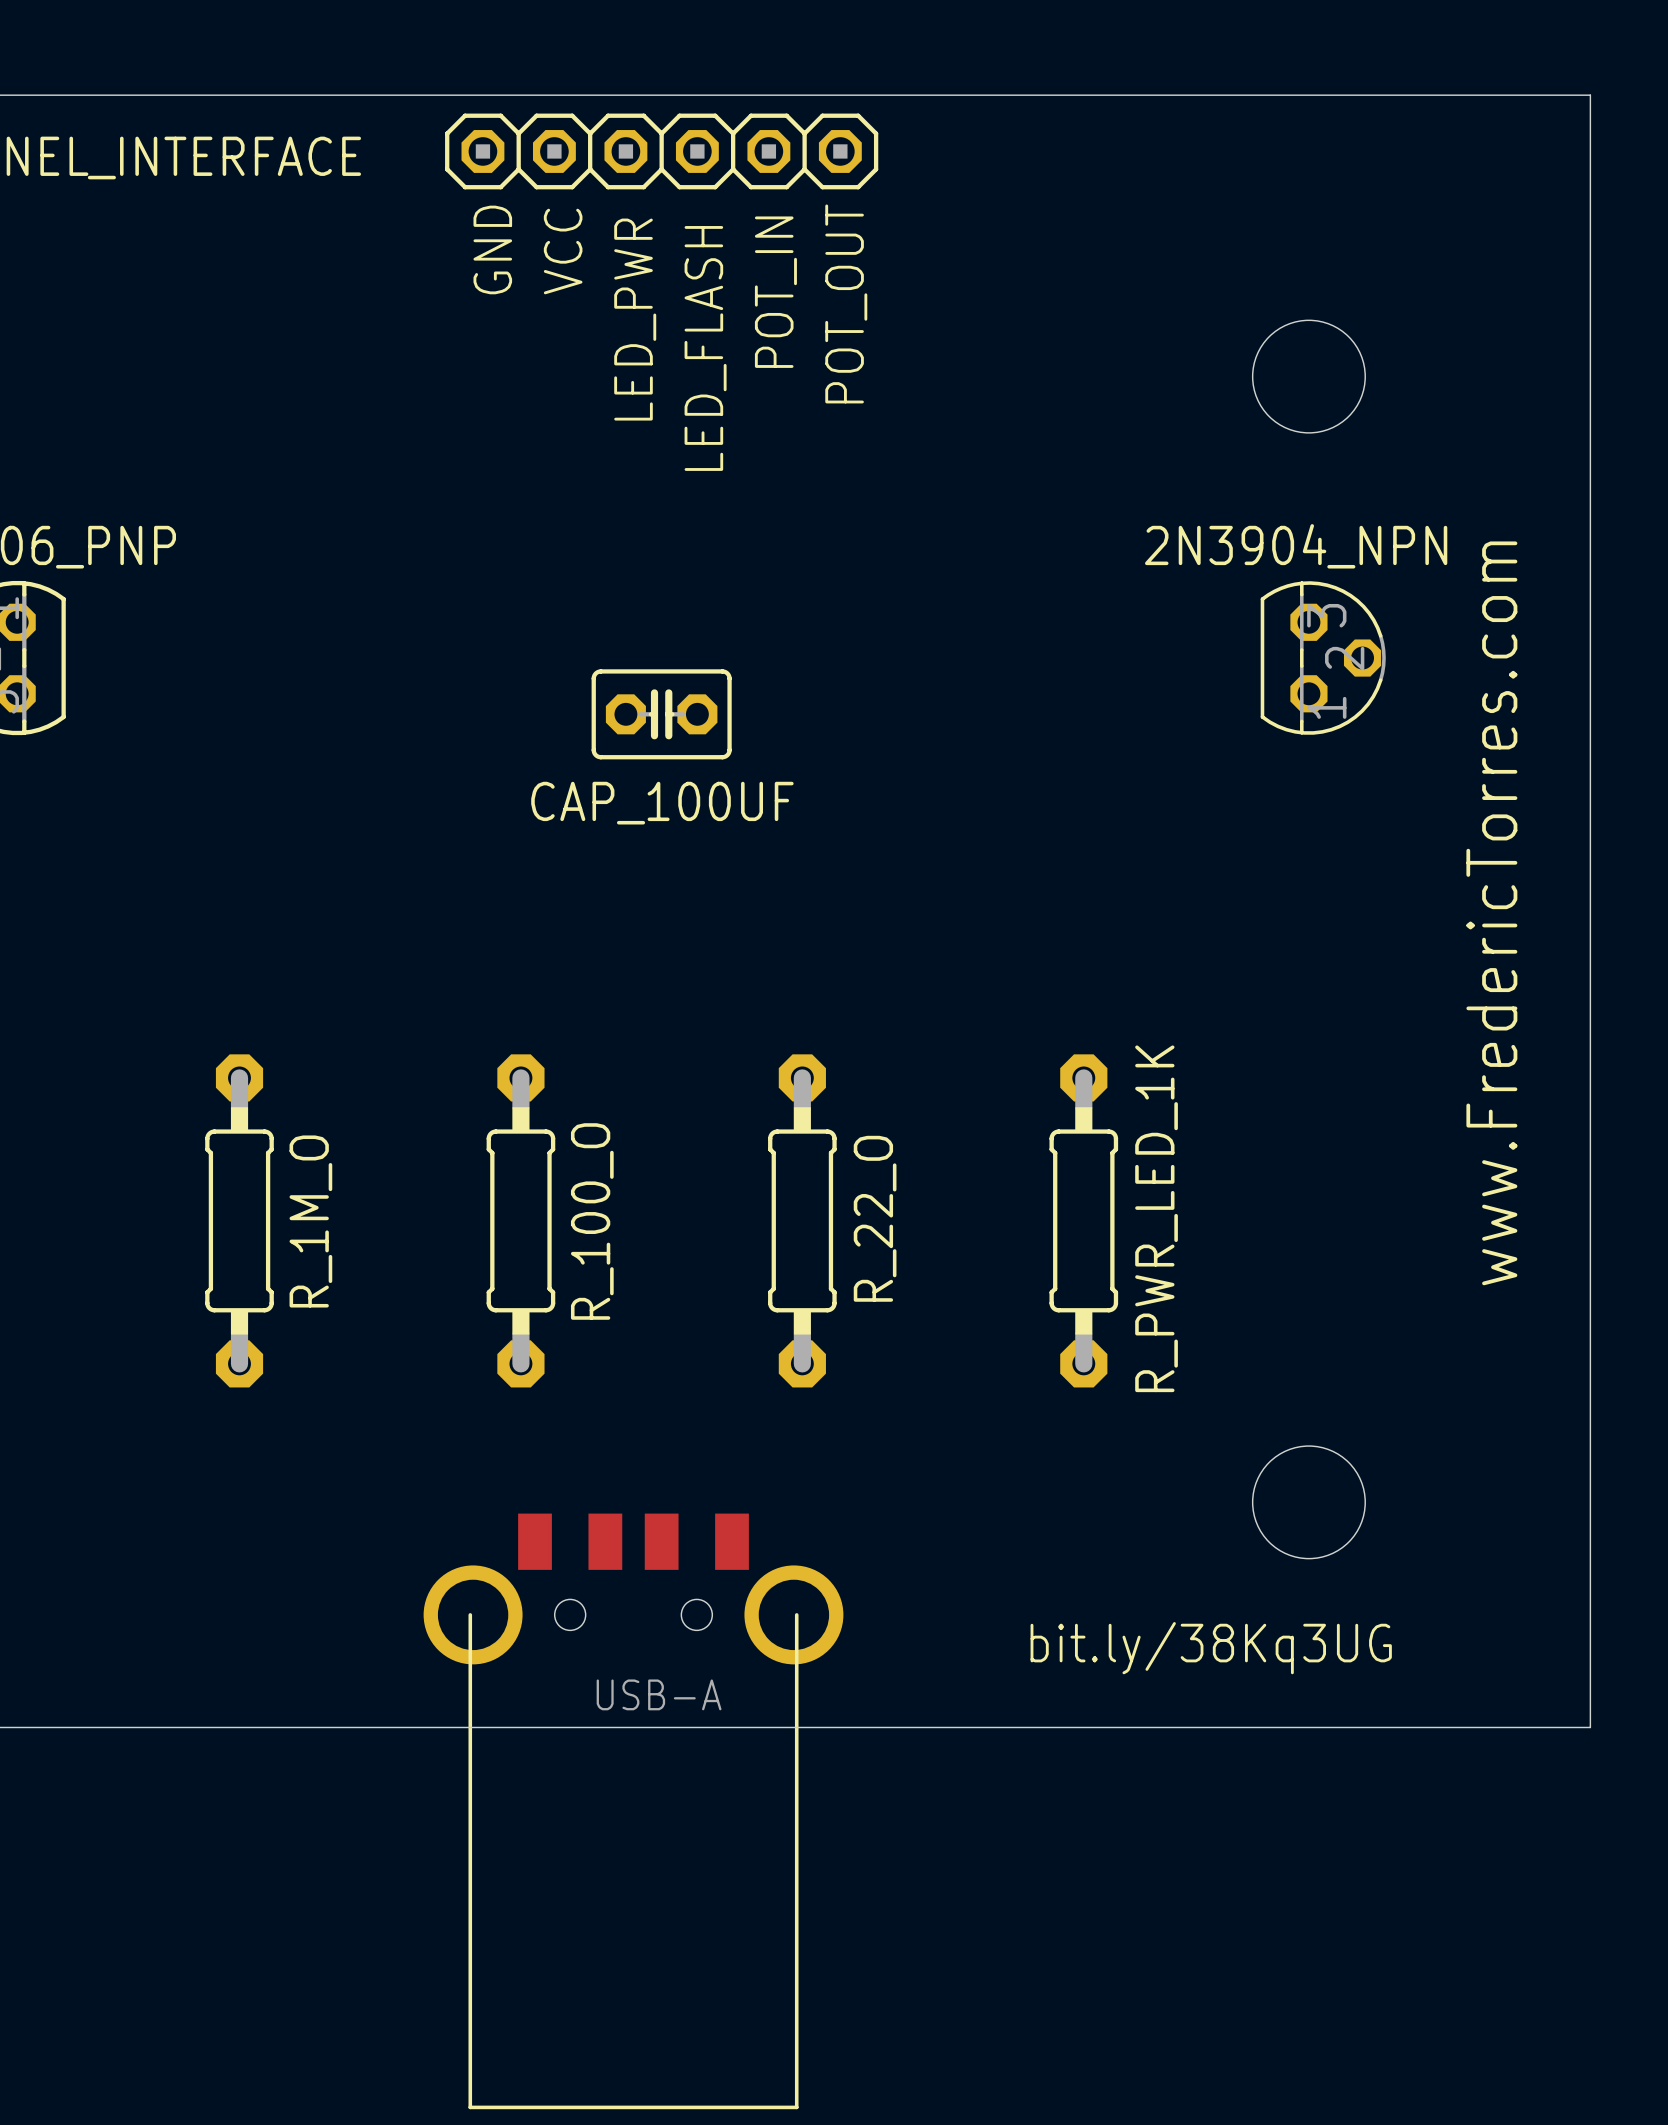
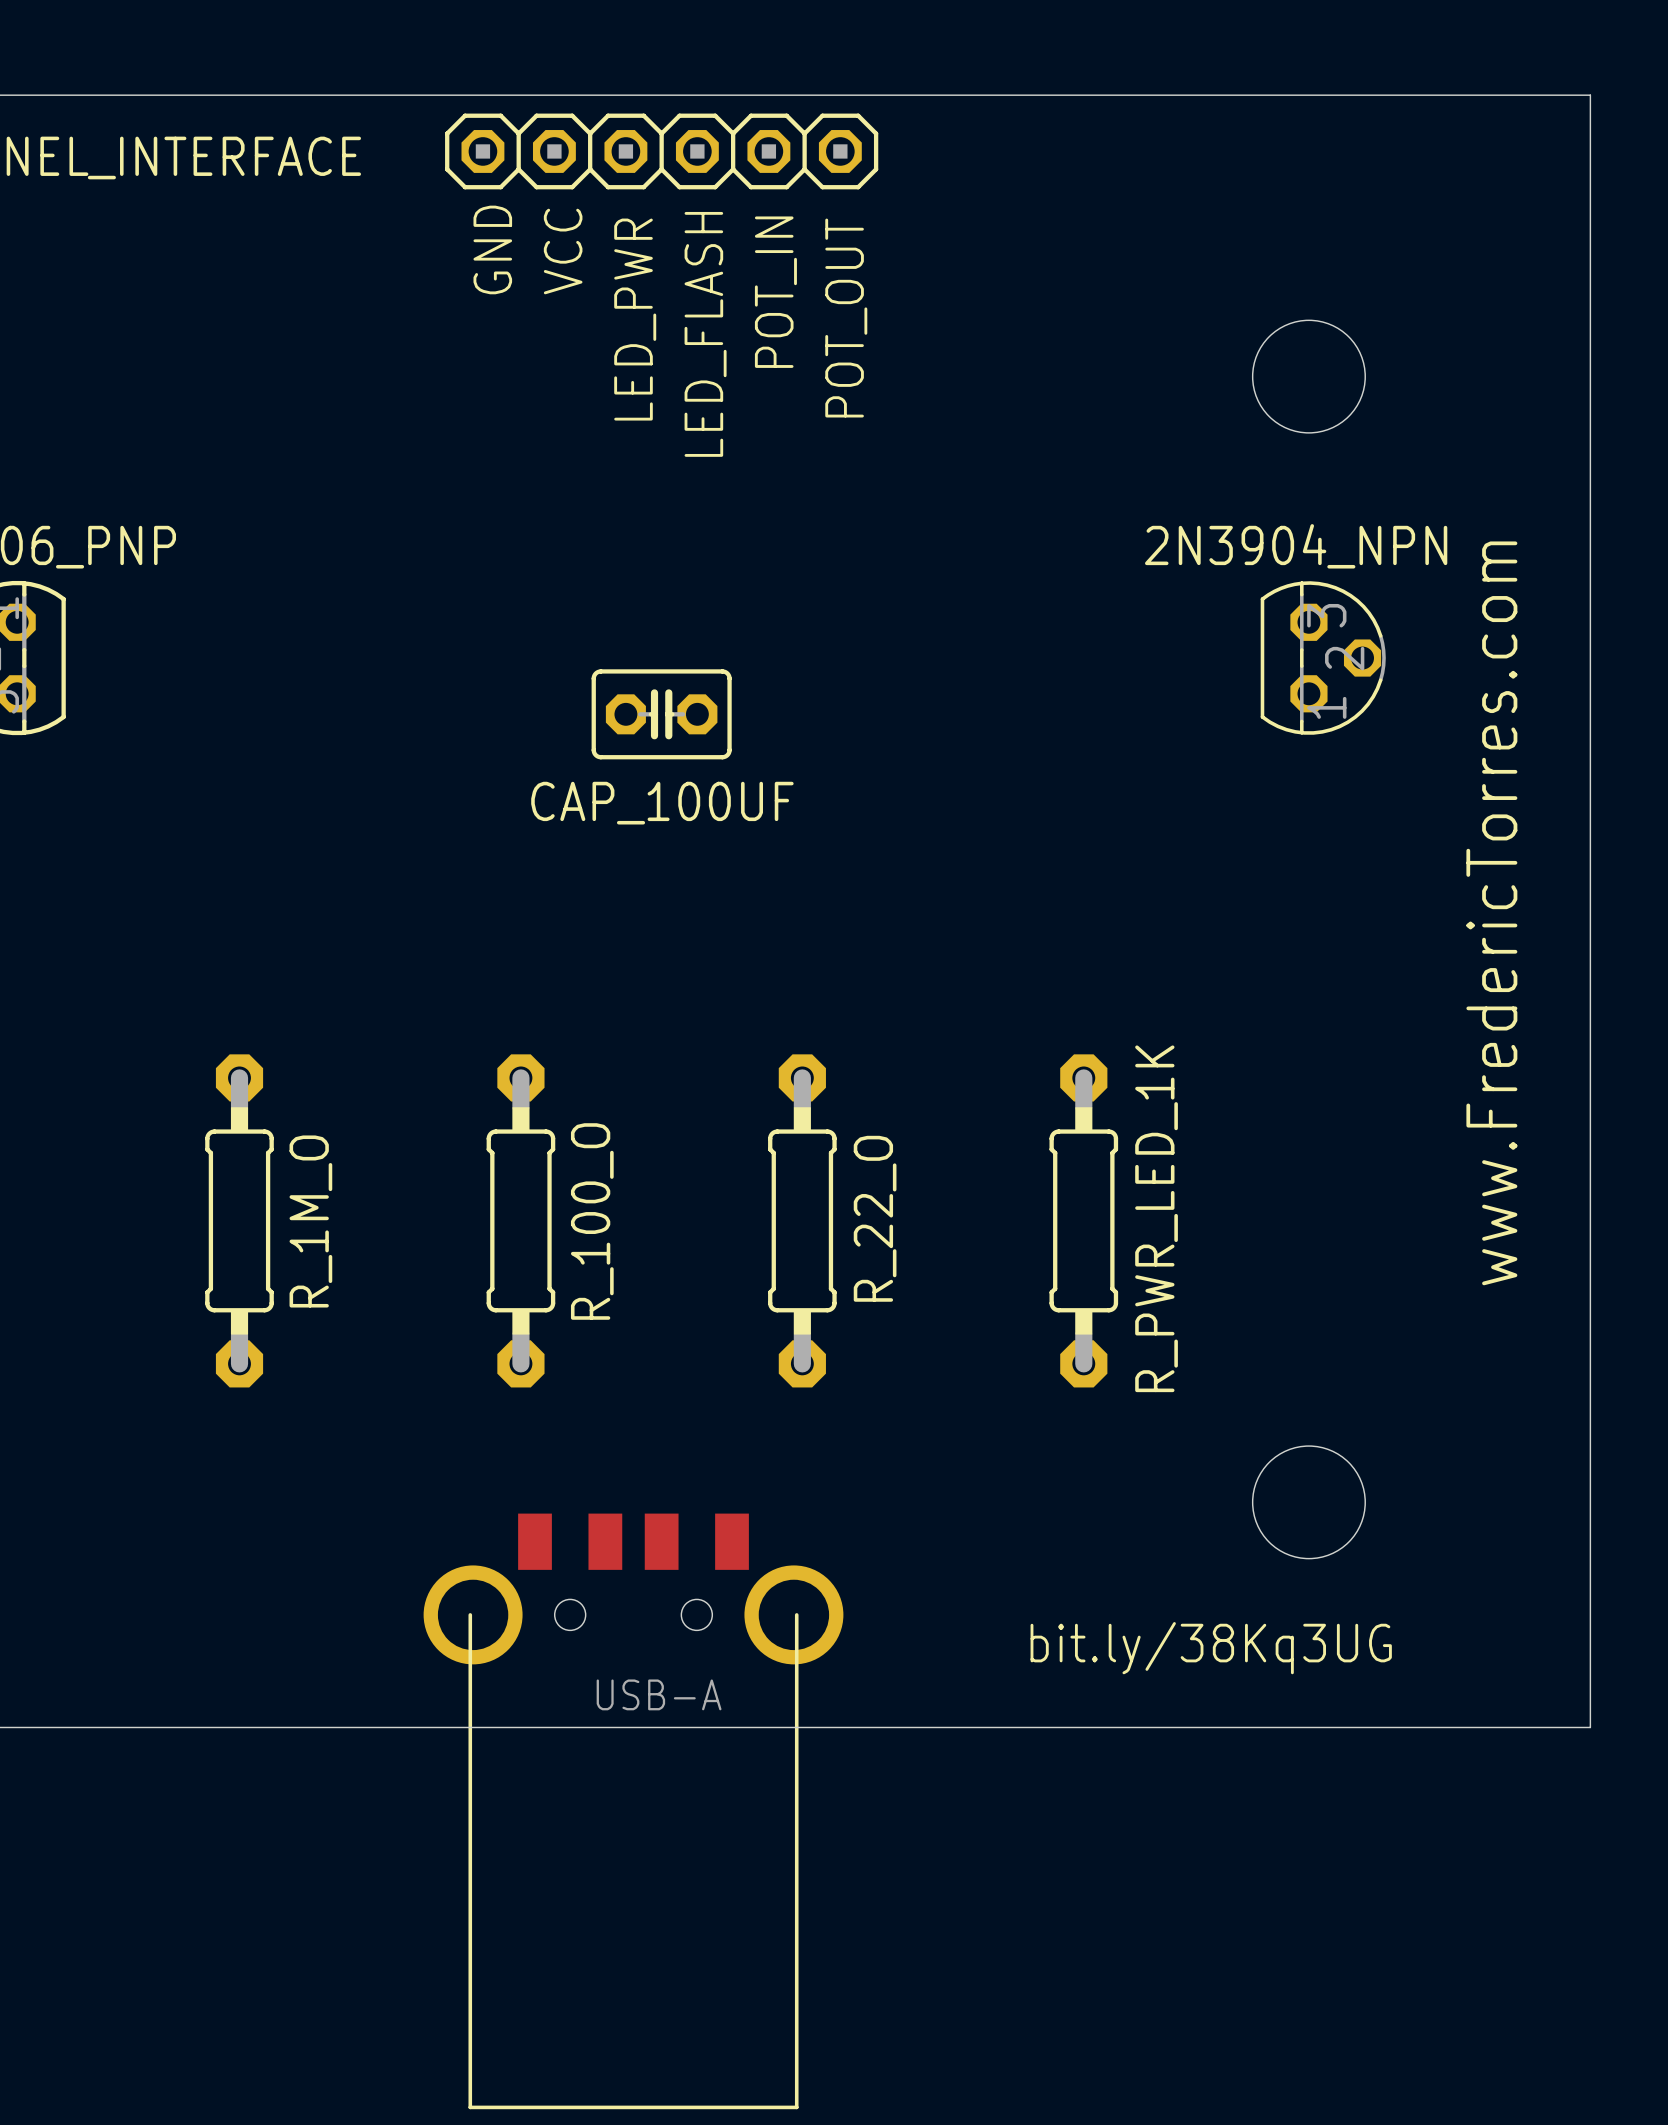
text position: POT_OUT (846, 303) -> POT_OUT (846, 318)
text position: LED_FLASH (705, 348) -> LED_FLASH (705, 334)

